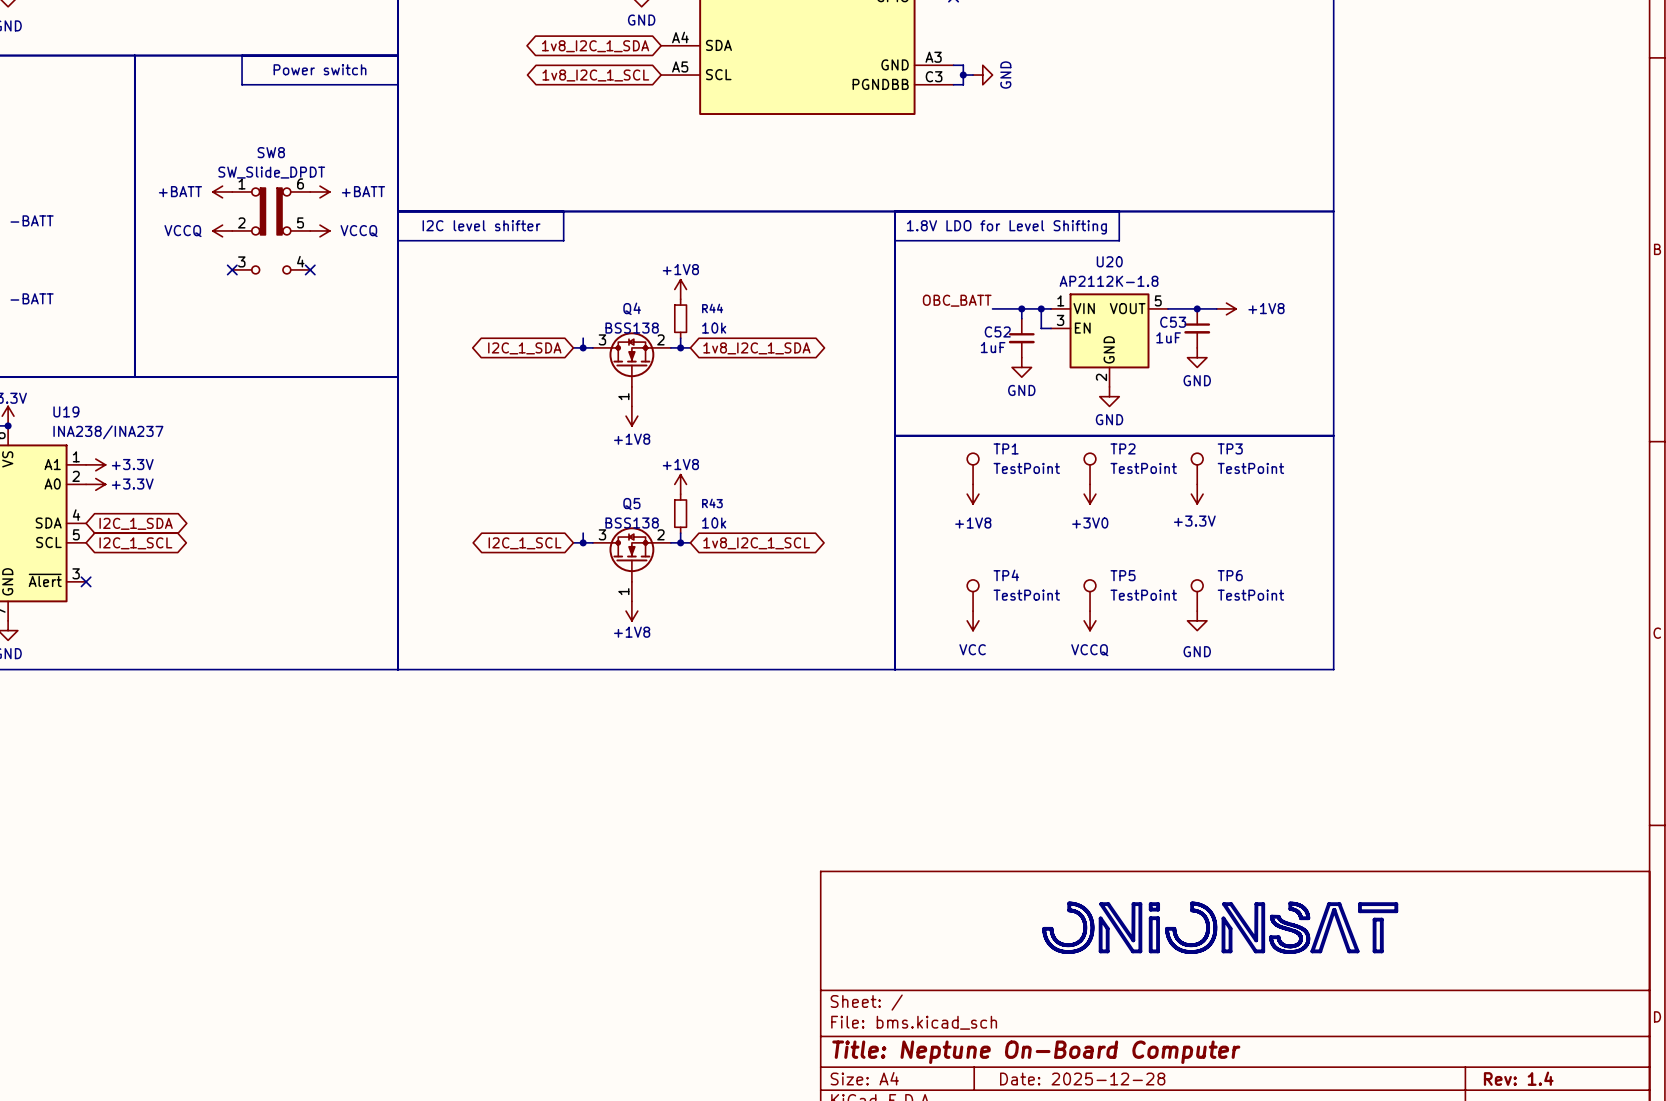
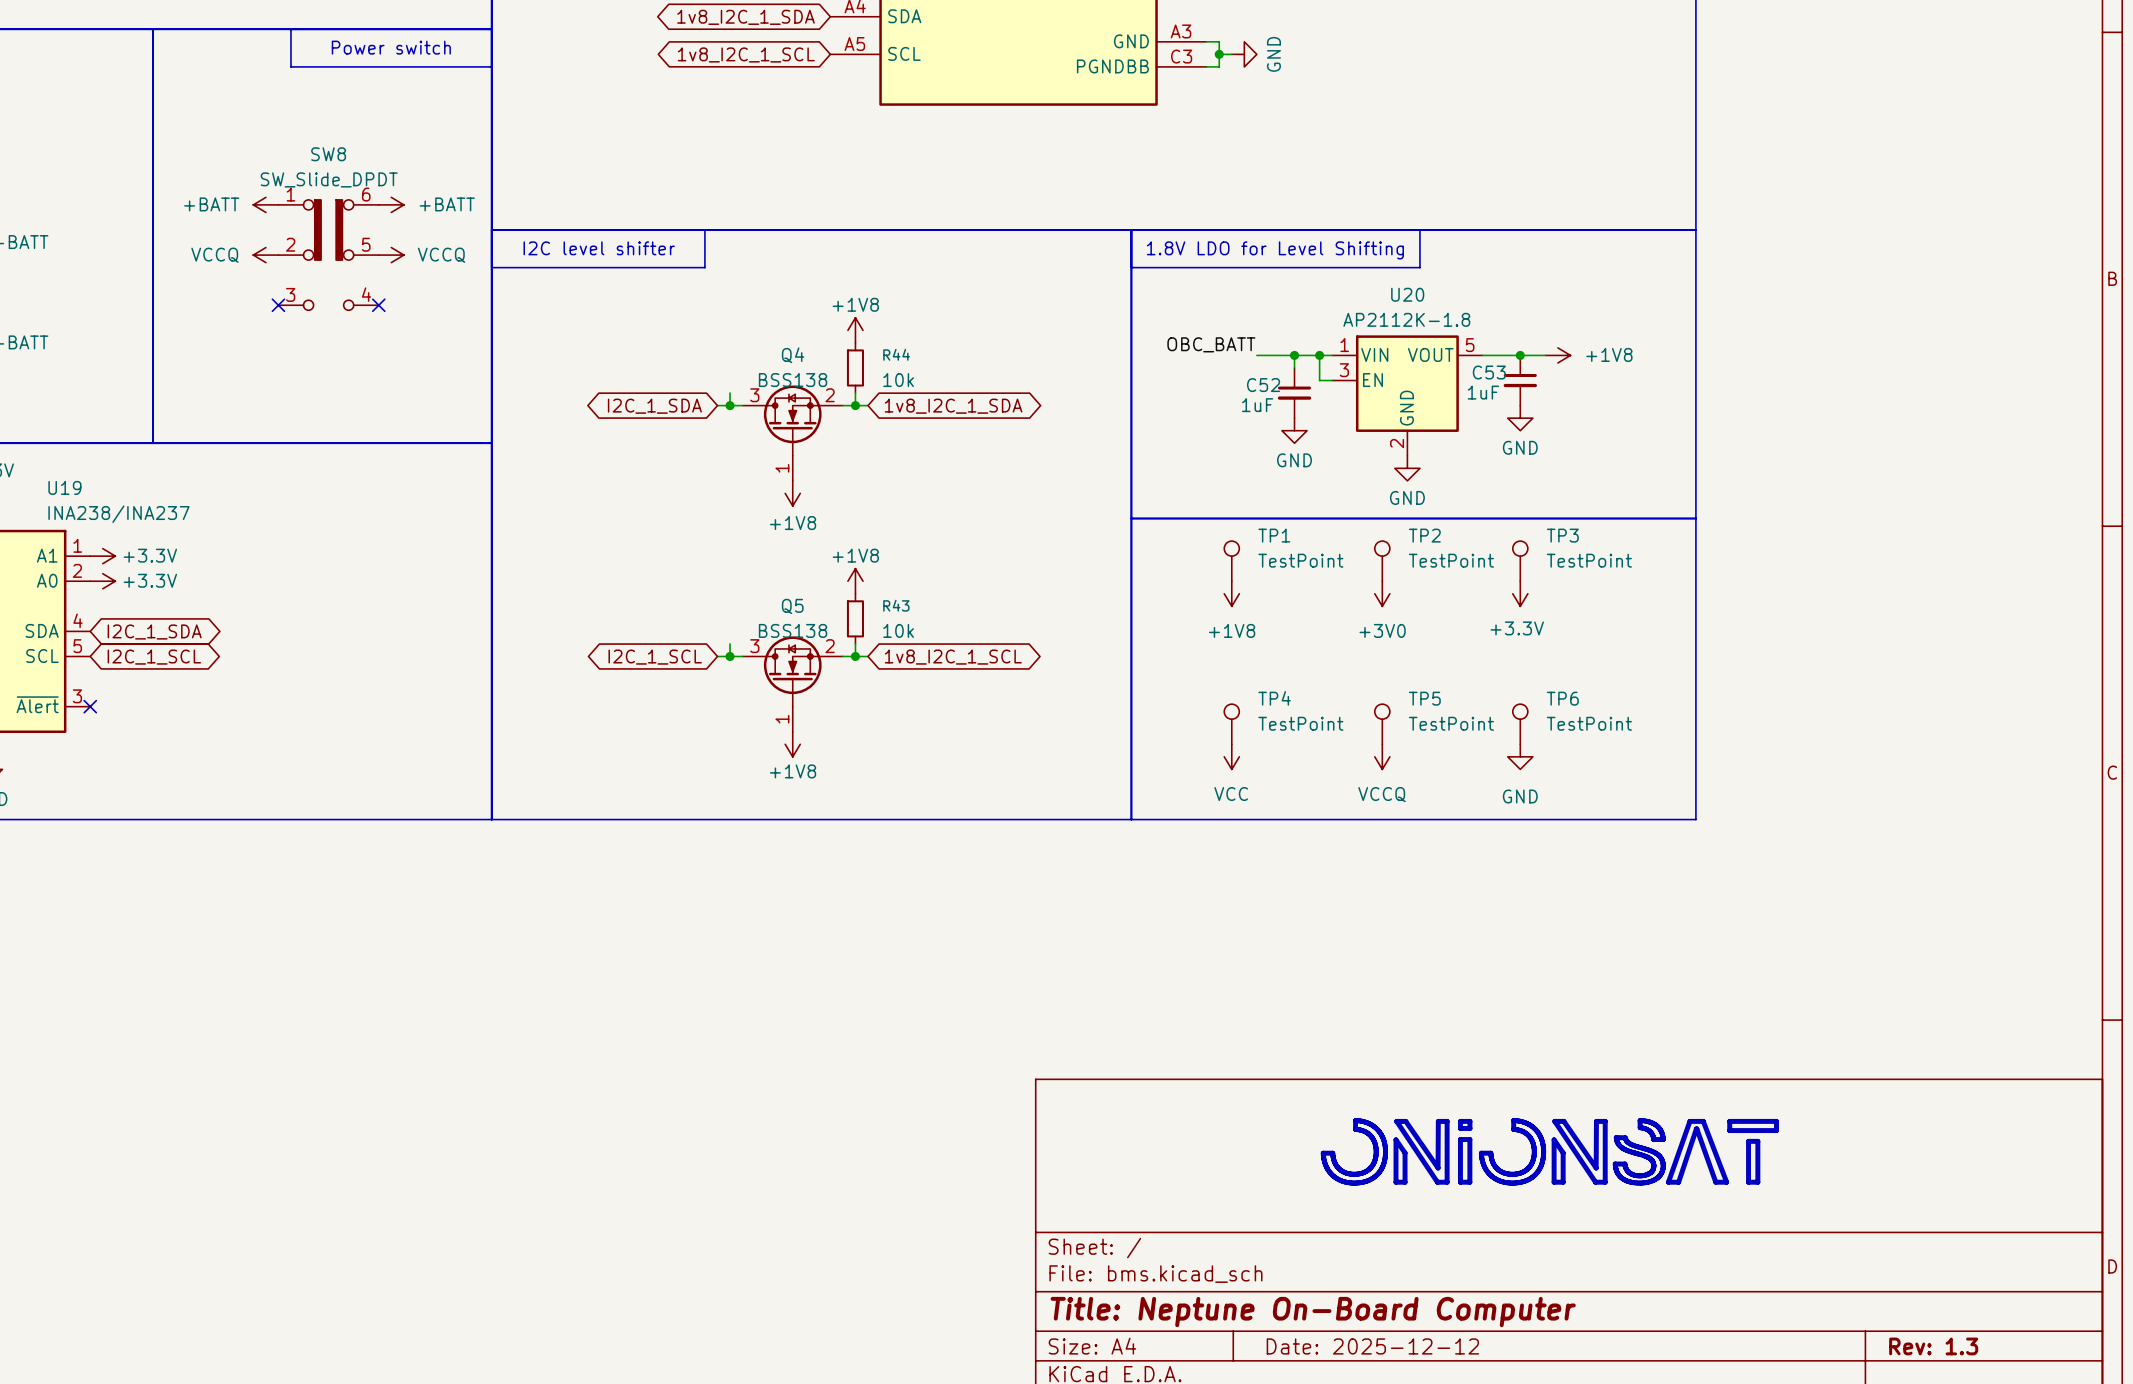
title block: Date: 2025-12-28 (1082, 1078) -> Date: 2025-12-12 (1372, 1346)
title block: Rev: 1.4 (1518, 1078) -> Rev: 1.3 (1933, 1346)

